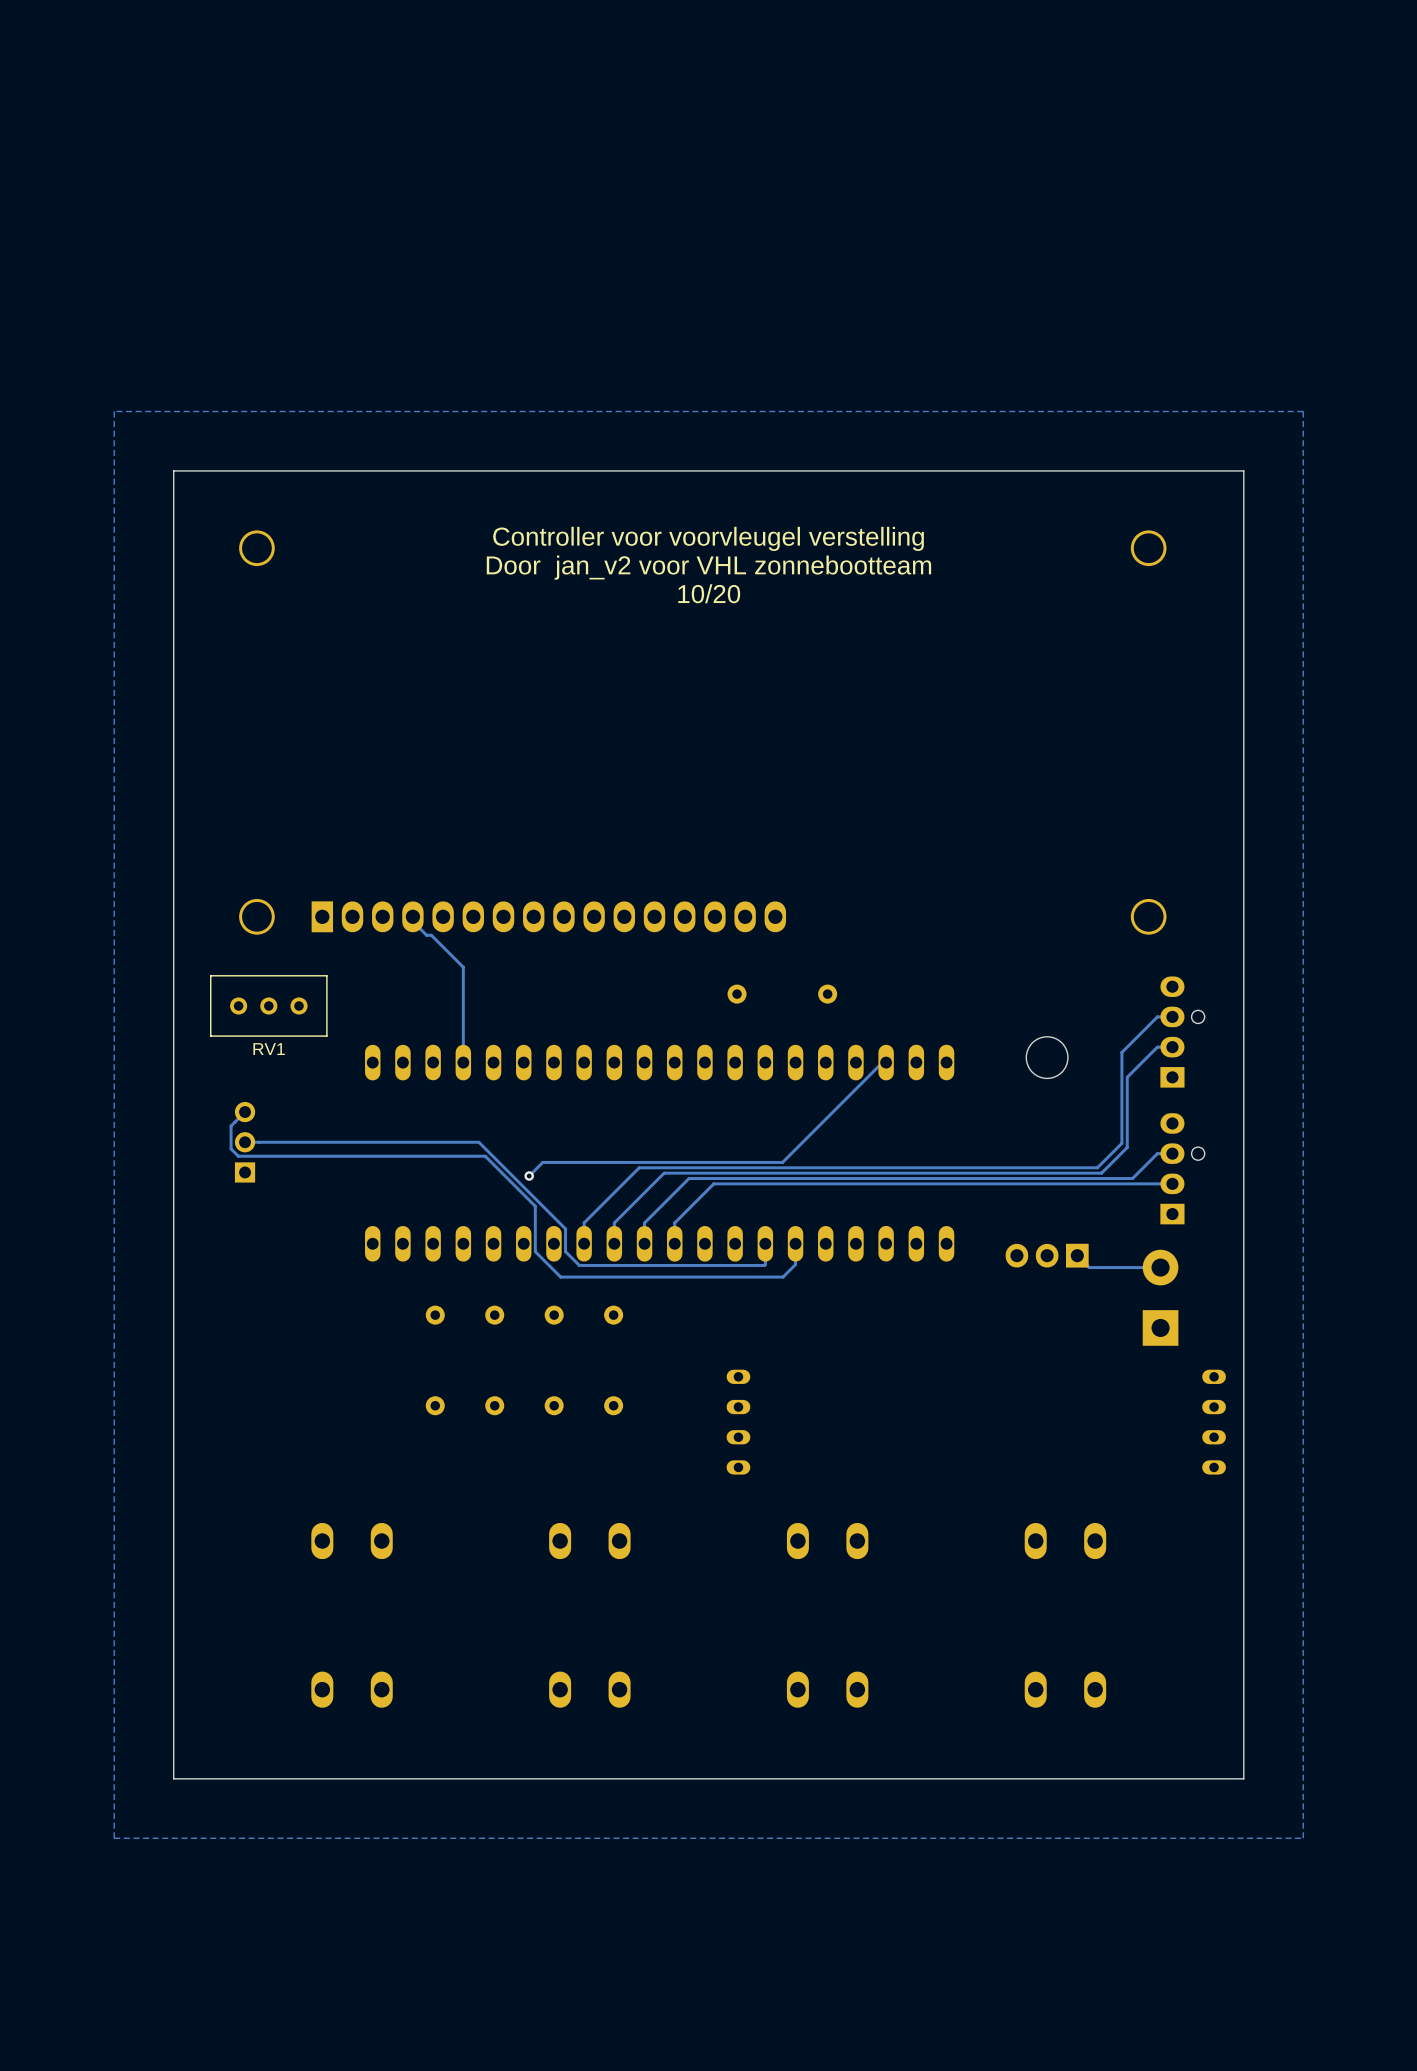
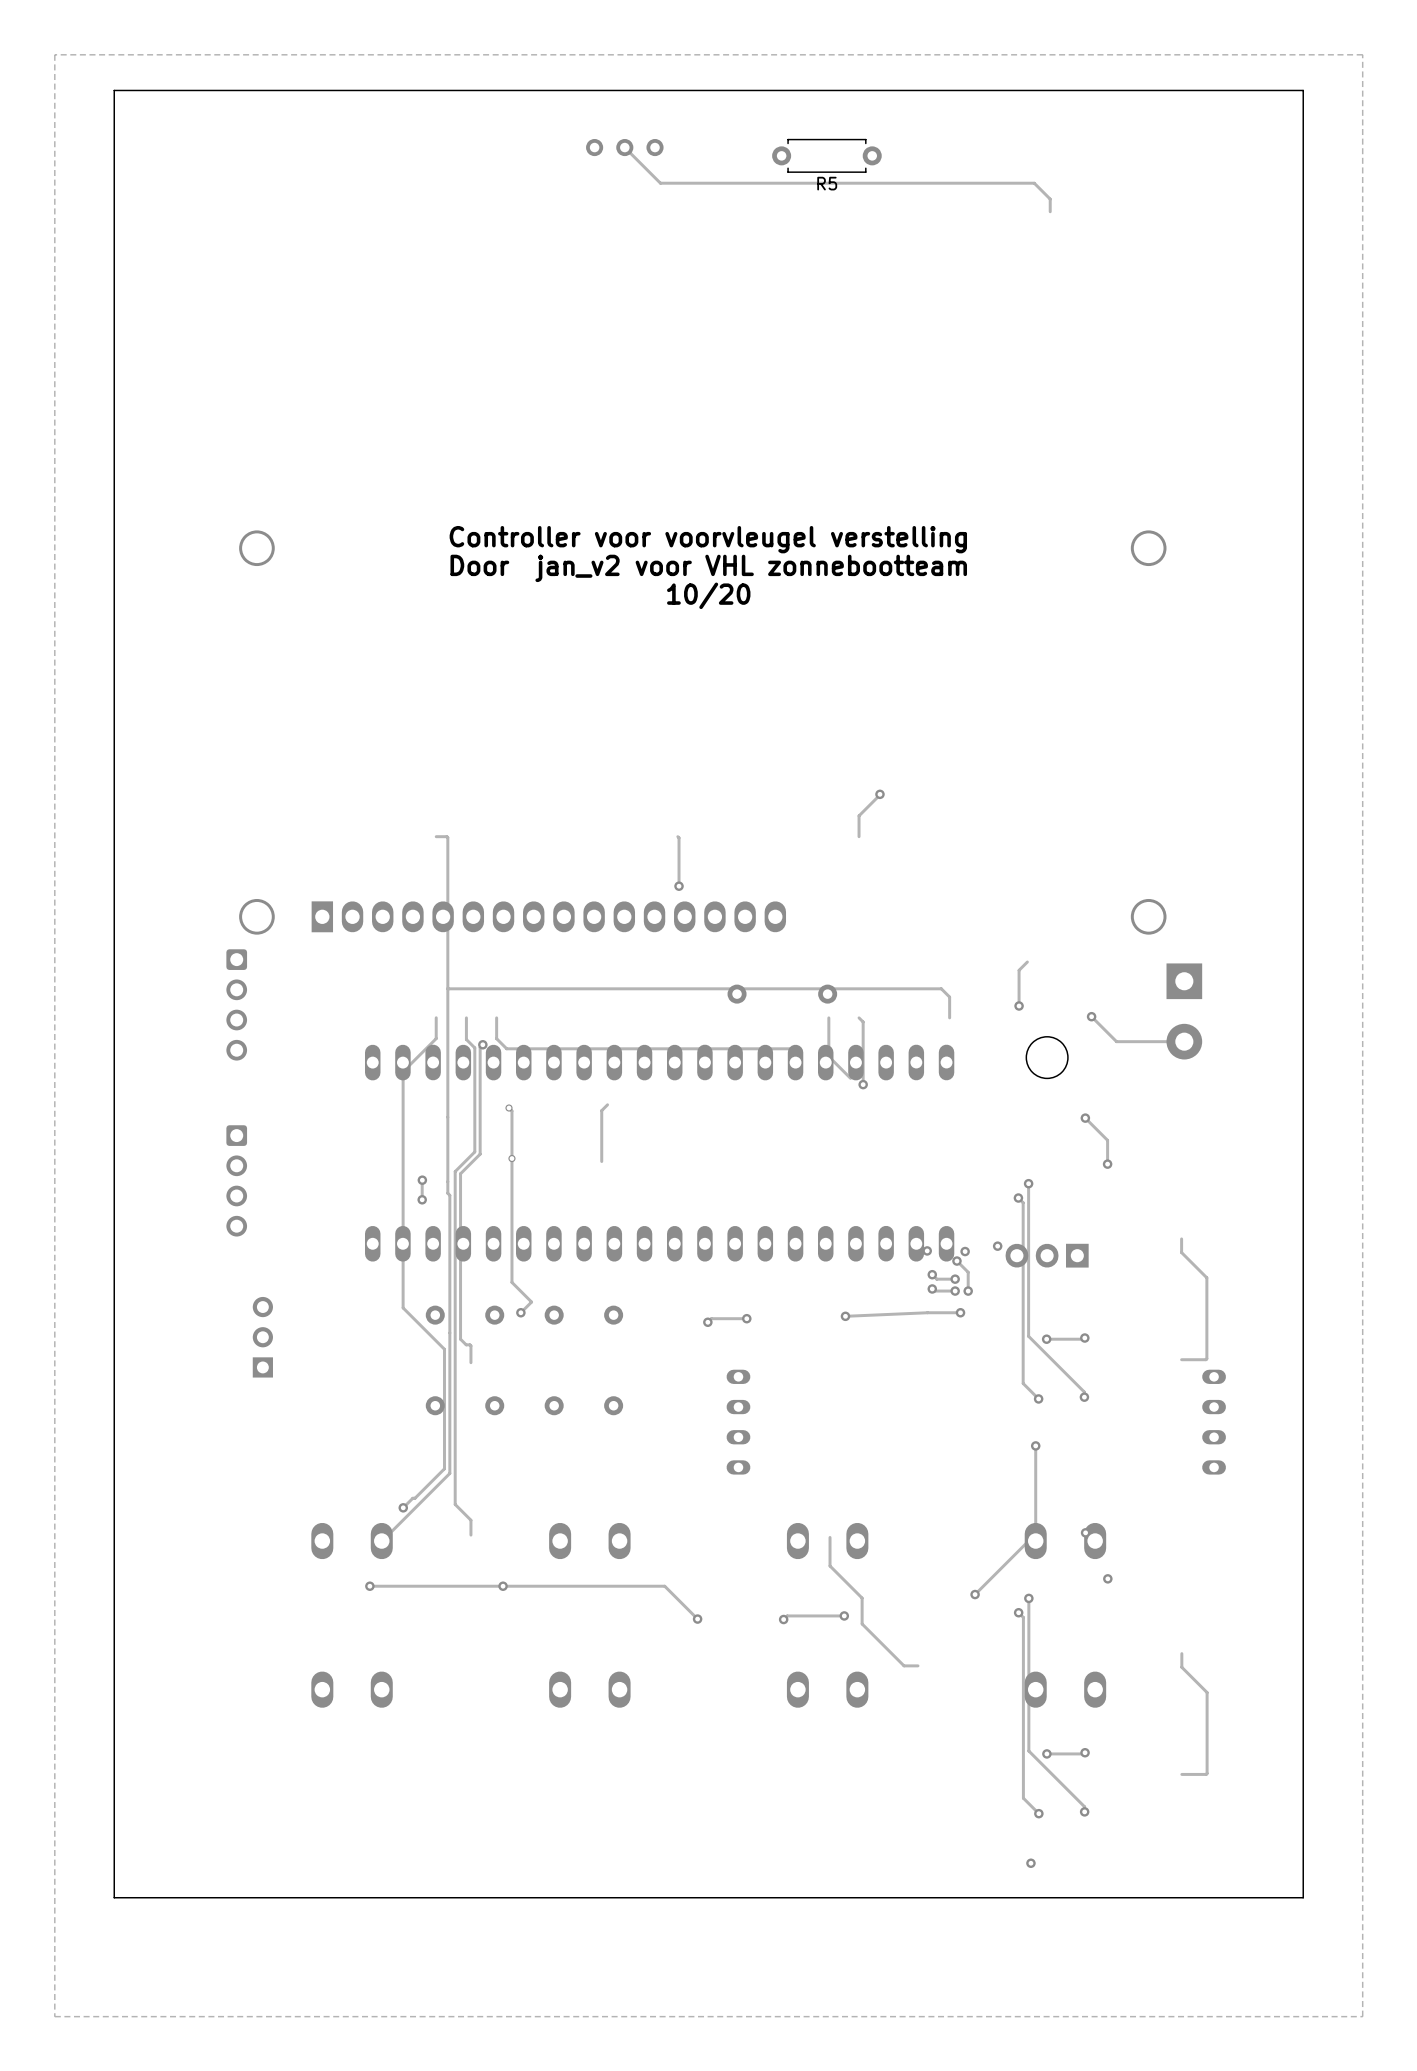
track: none -> (624, 147) (660, 183) (1034, 183) (1050, 199) (1050, 211)
part: none -> (624, 147)
R5: none -> (826, 155)
zone outline: (1303, 411) (1303, 1838) (114, 1838) (114, 411) (1303, 411) -> (1362, 54) (1362, 2016) (54, 2016) (54, 54) (1362, 54)
board edge: (1243, 470) (1243, 1778) (173, 1778) (173, 470) (1243, 470) -> (1303, 90) (1303, 1897) (114, 1897) (114, 90) (1303, 90)
track: none -> (879, 794) (859, 815) (859, 836)
via: none -> (879, 794)
track: none -> (436, 836) (447, 837) (449, 1473) (377, 1548)
track: none -> (677, 836) (679, 886)
via: none -> (679, 886)
track: (412, 916) (412, 921) (426, 935) (431, 935) (463, 967) (463, 1062) -> none
track: none -> (1027, 962) (1019, 970) (1019, 1005)
track: none -> (447, 988) (941, 988) (949, 997) (949, 1017)
part: none -> (236, 1004)
RV1: (268, 1005) -> none
via: none -> (1019, 1005)
track: none -> (1091, 1016) (1116, 1041) (1184, 1041)
via: none -> (1091, 1016)
track: (1172, 1016) (1157, 1016) (1121, 1052) (1121, 1143) (1097, 1167) (639, 1167) (584, 1222) (584, 1243) -> none
track: none -> (436, 1017) (436, 1038) (403, 1071) (403, 1307) (444, 1349) (444, 1468) (403, 1507)
track: none -> (466, 1017) (466, 1039) (474, 1047) (474, 1151) (455, 1171) (455, 1504) (470, 1520) (470, 1535)
track: none -> (496, 1017) (496, 1038) (506, 1048) (799, 1048)
track: none -> (828, 1017) (828, 1056) (850, 1078)
track: none -> (859, 1017) (863, 1022) (863, 1084)
part: (1182, 1032) -> none
track: none -> (482, 1044) (480, 1047) (480, 1154) (460, 1173) (460, 1339) (466, 1344) (470, 1345) (470, 1362)
via: none -> (482, 1044)
track: (1172, 1047) (1157, 1047) (1127, 1077) (1127, 1147) (1101, 1173) (664, 1173) (614, 1222) (614, 1243) -> none
track: (886, 1062) (886, 1058) (782, 1162) (542, 1162) (529, 1176) -> none
via: none -> (863, 1084)
track: none -> (607, 1104) (601, 1110) (601, 1161)
track: none -> (508, 1108) (511, 1110) (511, 1282) (531, 1302) (520, 1312)
via: none -> (508, 1108)
track: (245, 1112) (231, 1126) (231, 1148) (238, 1156) (485, 1156) (535, 1206) (535, 1251) (560, 1277) (783, 1277) (795, 1264) (795, 1243) -> none
track: none -> (1085, 1118) (1107, 1140) (1107, 1164)
via: none -> (1085, 1118)
track: (245, 1142) (478, 1142) (565, 1228) (565, 1251) (579, 1265) (764, 1265) (765, 1243) -> none
part position: (245, 1142) -> (262, 1337)
track: (1172, 1153) (1157, 1153) (1132, 1178) (689, 1178) (644, 1222) (644, 1243) -> none
via: none -> (511, 1158)
via: none -> (1107, 1164)
part: (1182, 1168) -> none
via: (529, 1176) -> none
part: none -> (236, 1180)
track: none -> (422, 1180) (422, 1199)
via: none -> (422, 1180)
track: none -> (1028, 1183) (1028, 1336) (1084, 1392) (1084, 1397)
via: none -> (1028, 1183)
track: (1172, 1183) (713, 1183) (674, 1222) (674, 1243) -> none
track: none -> (1018, 1198) (1023, 1202) (1023, 1383) (1038, 1398)
via: none -> (1018, 1198)
via: none -> (422, 1199)
track: none -> (1181, 1238) (1181, 1252) (1206, 1277) (1206, 1358) (1181, 1359)
via: none -> (997, 1246)
via: none -> (927, 1250)
via: none -> (965, 1251)
track: (1077, 1255) (1089, 1267) (1160, 1267) -> none
track: none -> (956, 1261) (968, 1272) (968, 1291)
via: none -> (956, 1261)
track: none -> (932, 1274) (936, 1279) (955, 1279)
via: none -> (932, 1274)
via: none -> (955, 1279)
track: none -> (932, 1288) (934, 1291) (955, 1291)
via: none -> (932, 1288)
via: none -> (955, 1291)
via: none -> (968, 1291)
part rotation: 0° (1160, 1297) -> 180° (1184, 1011)
part position: (1160, 1297) -> (1184, 1011)
via: none -> (520, 1312)
track: none -> (960, 1312) (845, 1316)
via: none -> (960, 1312)
via: none -> (845, 1316)
track: none -> (746, 1318) (711, 1318) (707, 1322)
via: none -> (746, 1318)
via: none -> (707, 1322)
track: none -> (1084, 1338) (1046, 1339)
via: none -> (1084, 1338)
via: none -> (1046, 1339)
via: none -> (1084, 1397)
via: none -> (1038, 1398)
track: none -> (1035, 1445) (1035, 1533) (975, 1594)
via: none -> (1035, 1445)
via: none -> (403, 1507)
via: none -> (1085, 1532)
track: none -> (830, 1537) (830, 1566) (862, 1598) (862, 1623) (904, 1665) (918, 1665)
via: none -> (1107, 1578)
track: none -> (369, 1586) (664, 1586) (697, 1619)
via: none -> (369, 1586)
via: none -> (503, 1586)
via: none -> (975, 1594)
track: none -> (1028, 1598) (1028, 1751) (1084, 1806) (1084, 1811)
via: none -> (1028, 1598)
track: none -> (1018, 1612) (1023, 1617) (1023, 1798) (1038, 1813)
via: none -> (1018, 1612)
track: none -> (844, 1615) (787, 1615) (783, 1619)
via: none -> (844, 1615)
via: none -> (697, 1619)
via: none -> (783, 1619)
track: none -> (1181, 1653) (1181, 1667) (1207, 1692) (1207, 1773) (1181, 1774)
track: none -> (1085, 1752) (1046, 1753)
via: none -> (1085, 1752)
via: none -> (1046, 1753)
via: none -> (1084, 1811)
via: none -> (1038, 1813)
via: none -> (1030, 1863)

